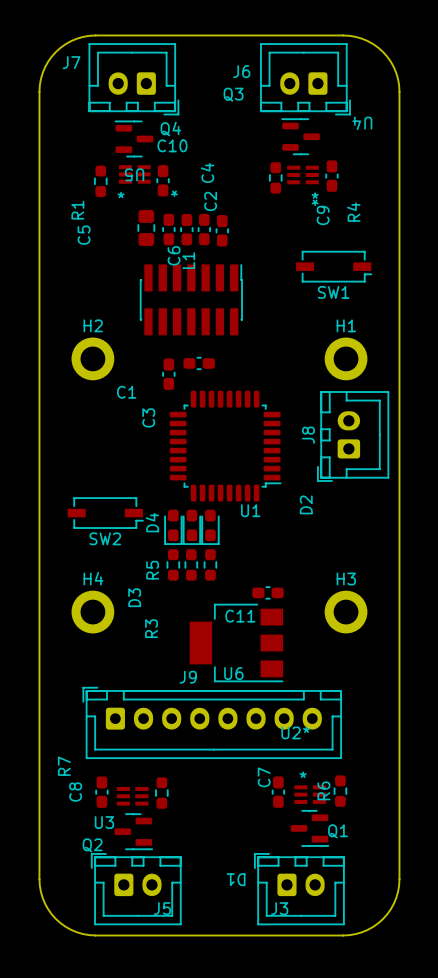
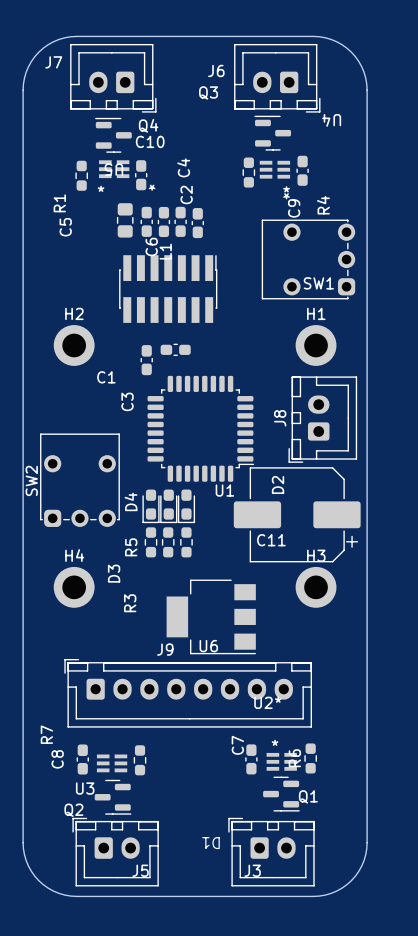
SW1 footprint: [296, 251, 372, 283] -> [261, 219, 356, 300]
SW2 footprint: [67, 497, 144, 529] -> [40, 433, 120, 527]
SW2 name position: SW2 (105, 538) -> SW2 (31, 480)
C11 footprint: [252, 586, 284, 600] -> [233, 467, 361, 563]

